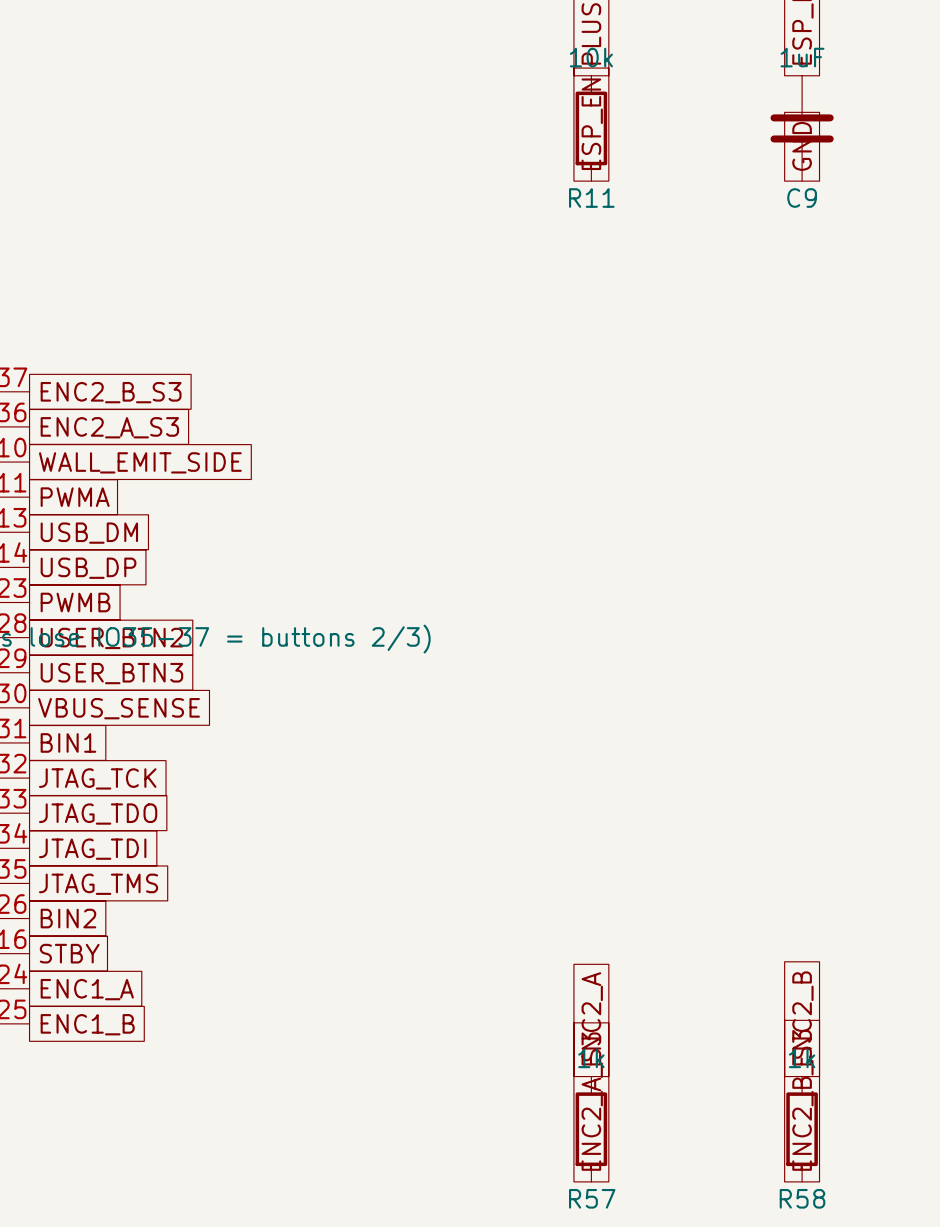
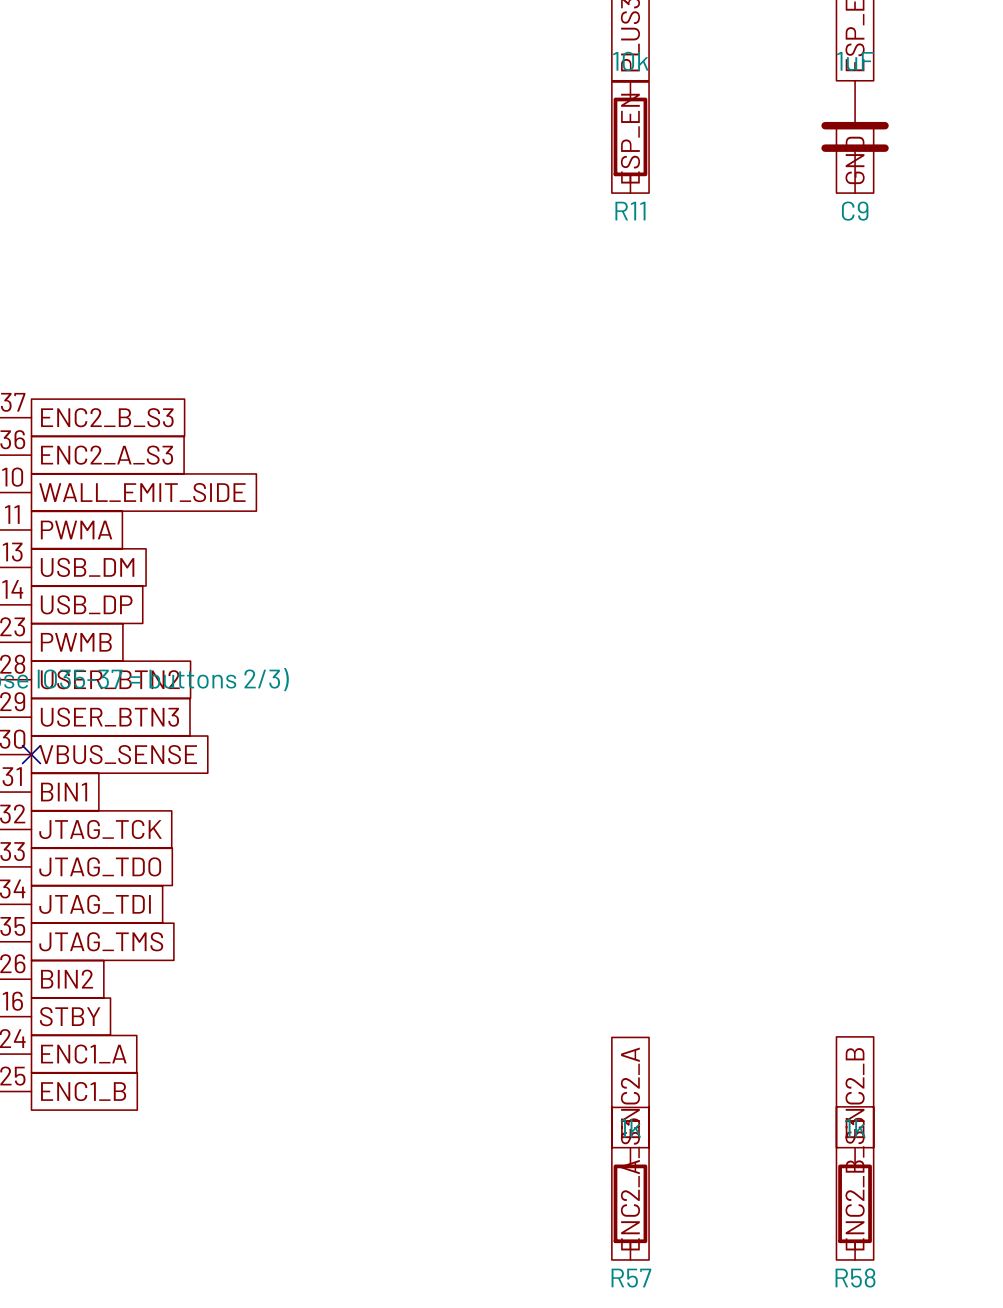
no-connect mark: none -> (31, 754)

